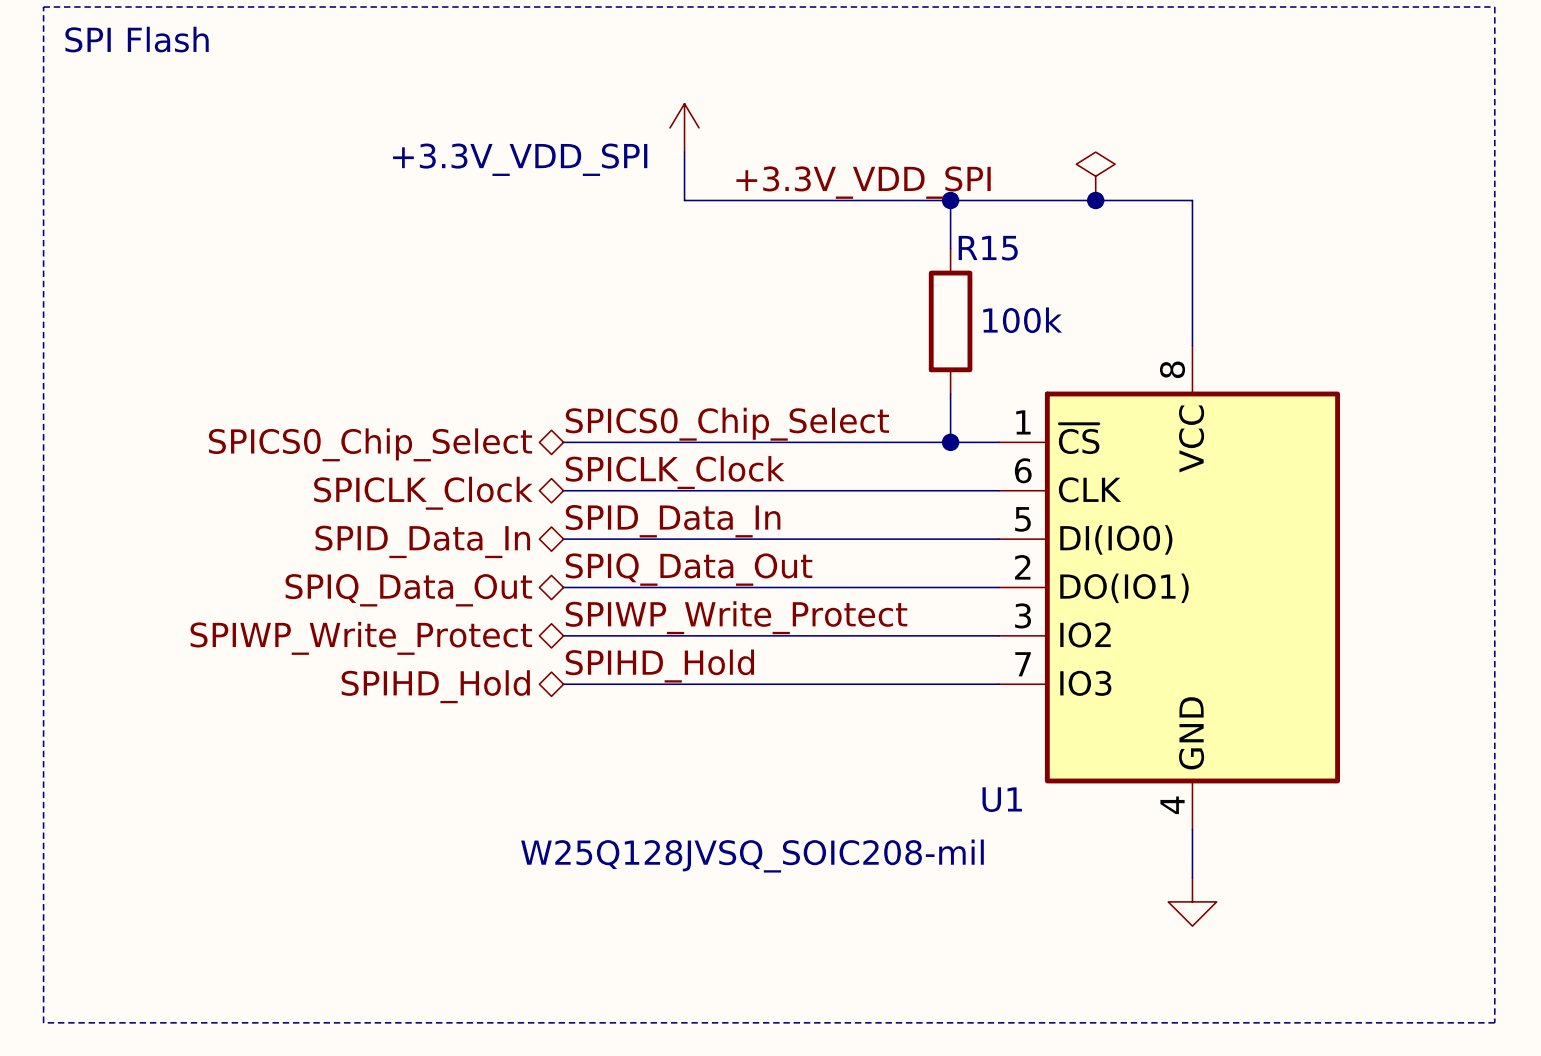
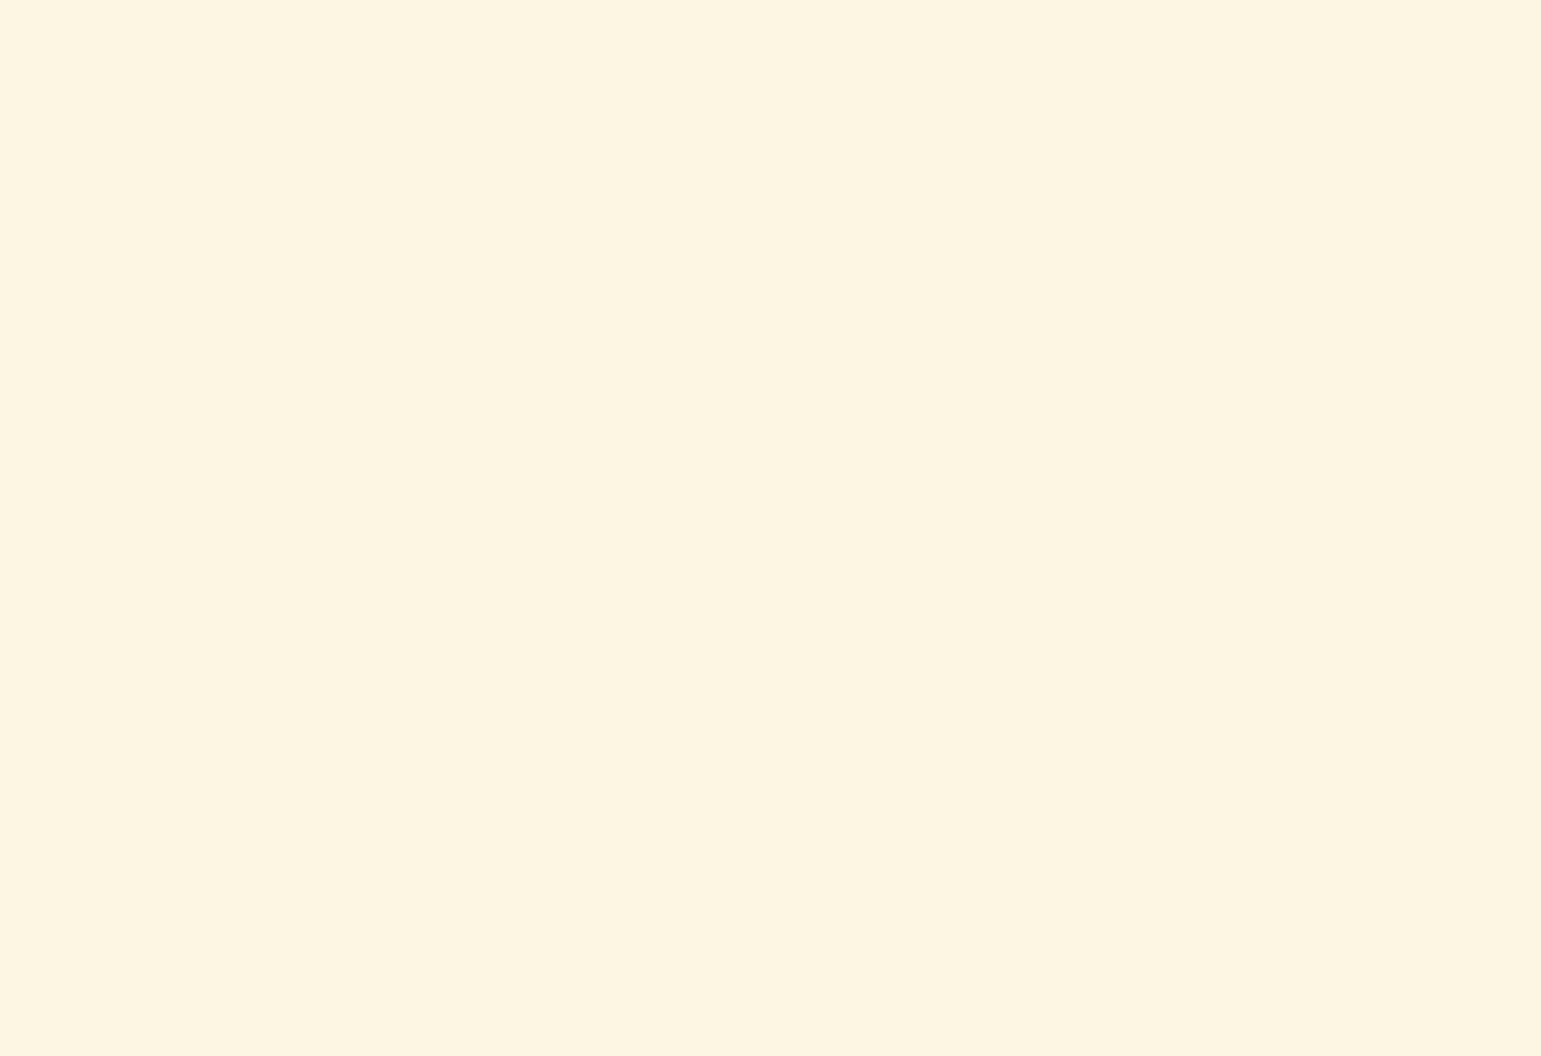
line: (43, 7) (1494, 7) (1494, 1022) (43, 1022) (43, 7) -> none
text: SPI Flash (137, 39) -> none
power symbol: +3.3V_VDD_SPI (684, 127) -> none
wire: (684, 152) (684, 200) (1192, 200) (1192, 345) -> none
power symbol: (1095, 176) -> none
label: +3.3V_VDD_SPI (863, 182) -> none
wire: (950, 200) (950, 248) -> none
junction: (950, 200) -> none
junction: (1095, 200) -> none
R15: 100k (950, 321) -> none
wire: (950, 393) (950, 442) -> none
label: SPICS0_Chip_Select (727, 424) -> none
wire: (563, 442) (998, 442) -> none
junction: (950, 442) -> none
hierarchical label: SPICS0_Chip_Select (370, 444) -> none
label: SPICLK_Clock (675, 472) -> none
wire: (563, 490) (998, 490) -> none
hierarchical label: SPICLK_Clock (423, 493) -> none
label: SPID_Data_In (673, 521) -> none
wire: (563, 539) (998, 539) -> none
hierarchical label: SPID_Data_In (422, 541) -> none
label: SPIQ_Data_Out (689, 569) -> none
wire: (563, 587) (998, 587) -> none
U1: W25Q128JVSQ_SOIC208-mil (1169, 587) -> none
hierarchical label: SPIQ_Data_Out (408, 590) -> none
label: SPIWP_Write_Protect (736, 617) -> none
wire: (563, 635) (998, 635) -> none
hierarchical label: SPIWP_Write_Protect (361, 638) -> none
label: SPIHD_Hold (659, 666) -> none
wire: (563, 684) (998, 684) -> none
hierarchical label: SPIHD_Hold (435, 686) -> none
wire: (1192, 829) (1192, 877) -> none
power symbol: (1192, 901) -> none

